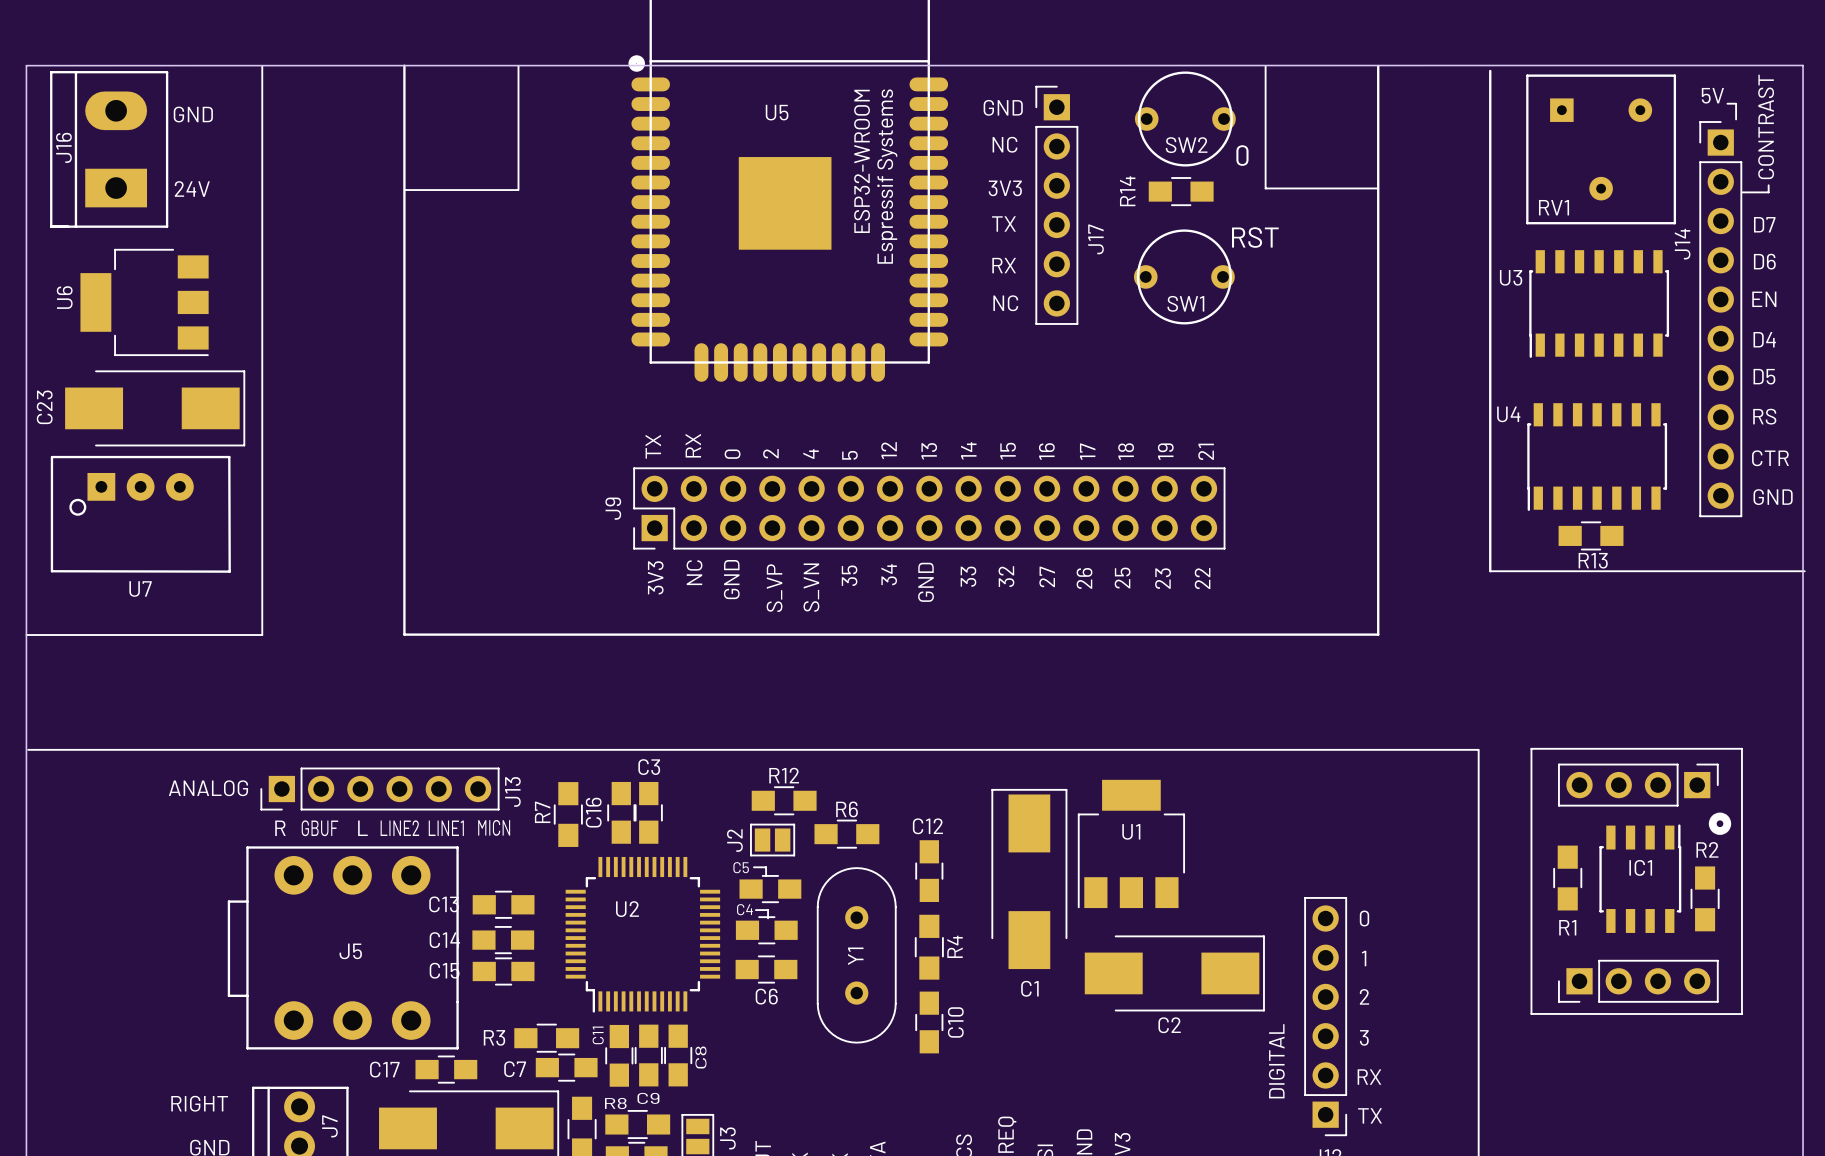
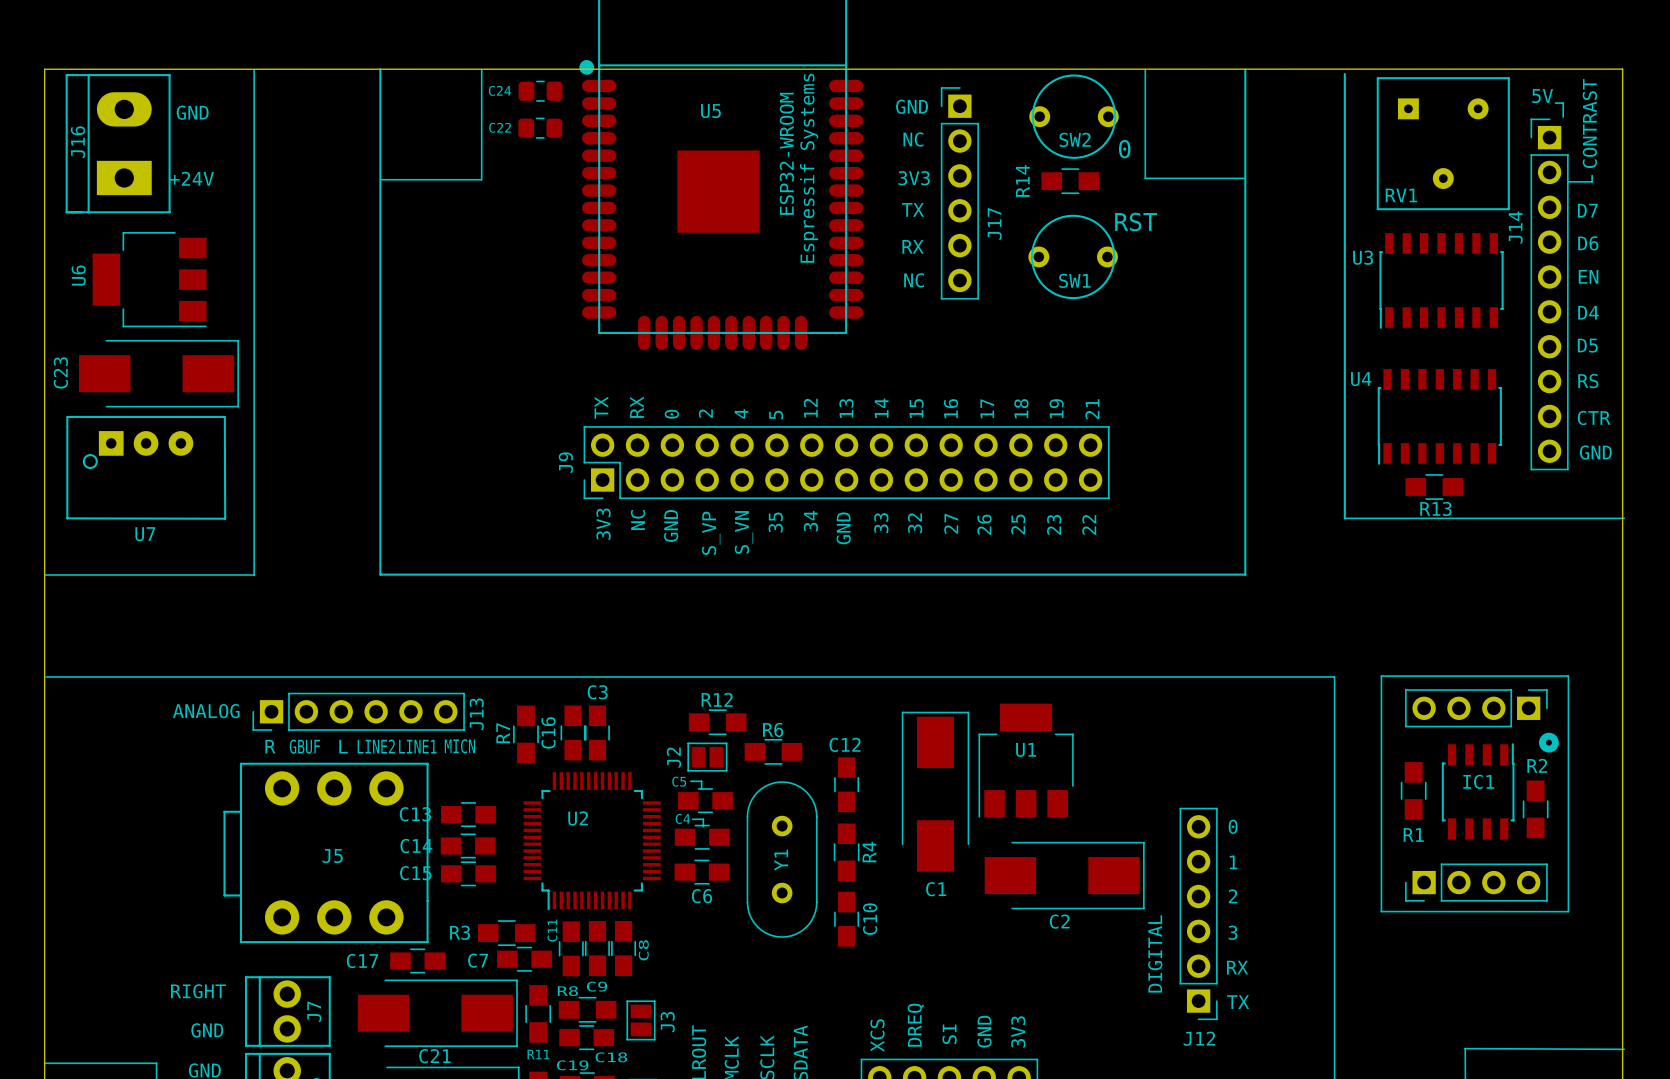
C24: none -> (540, 91)
C22: none -> (540, 128)
text: 24V (192, 188) -> +24V (191, 178)

